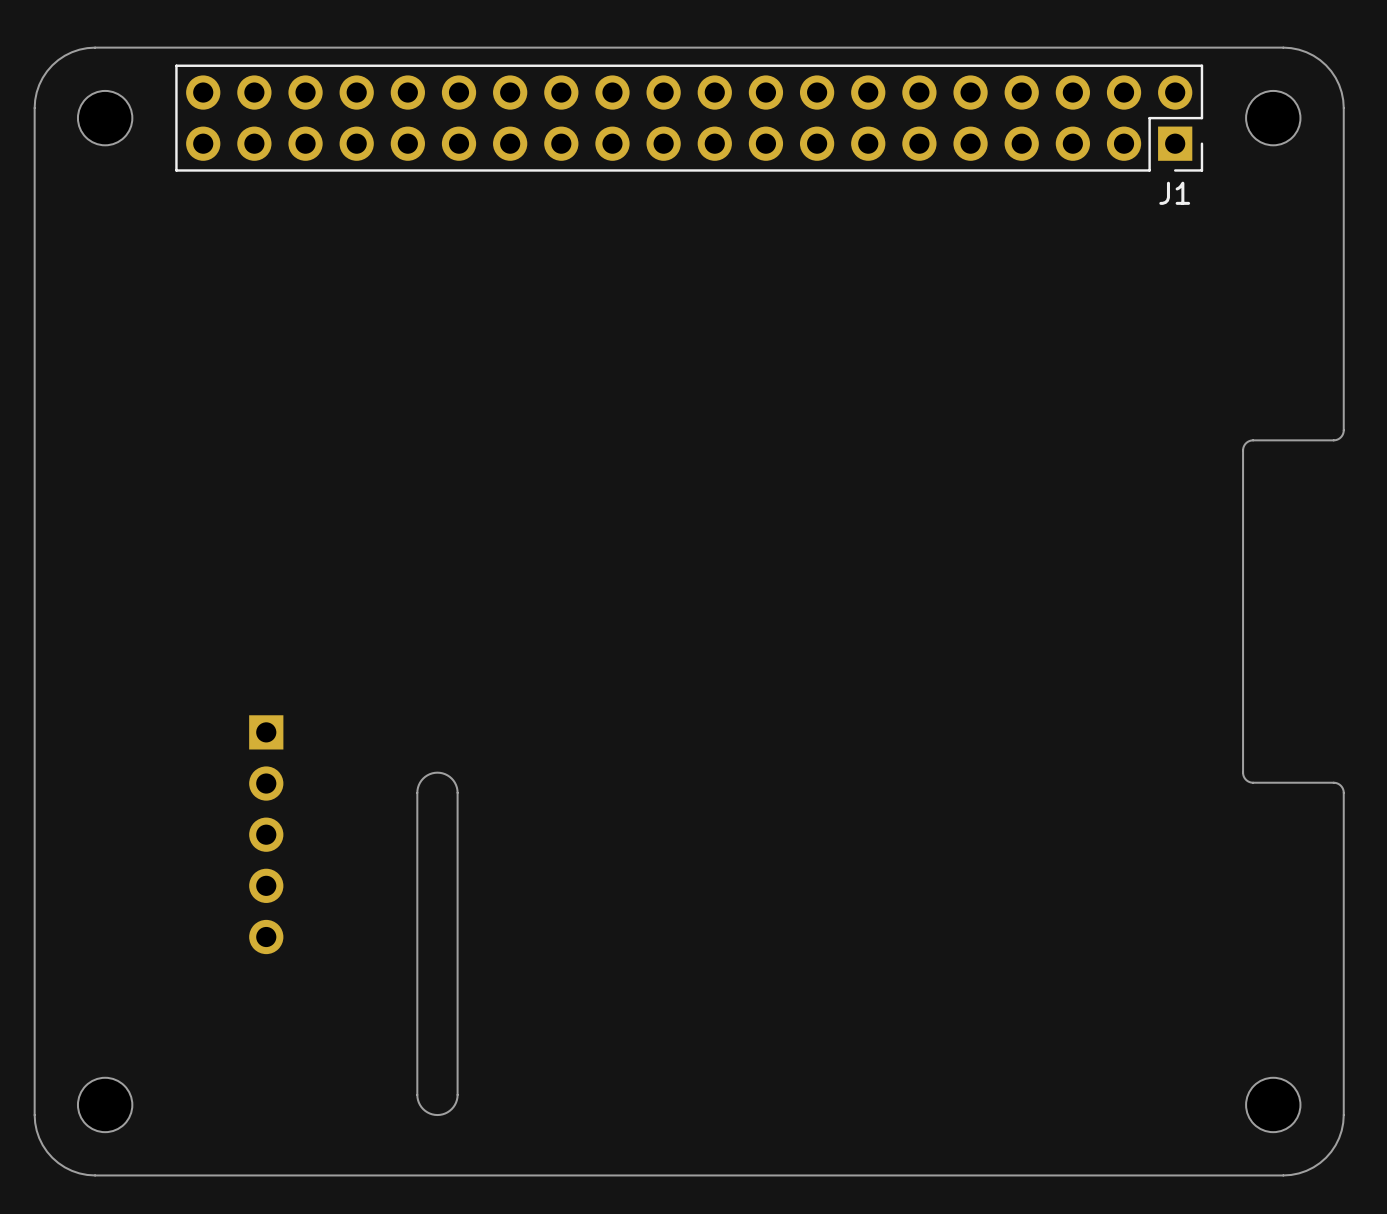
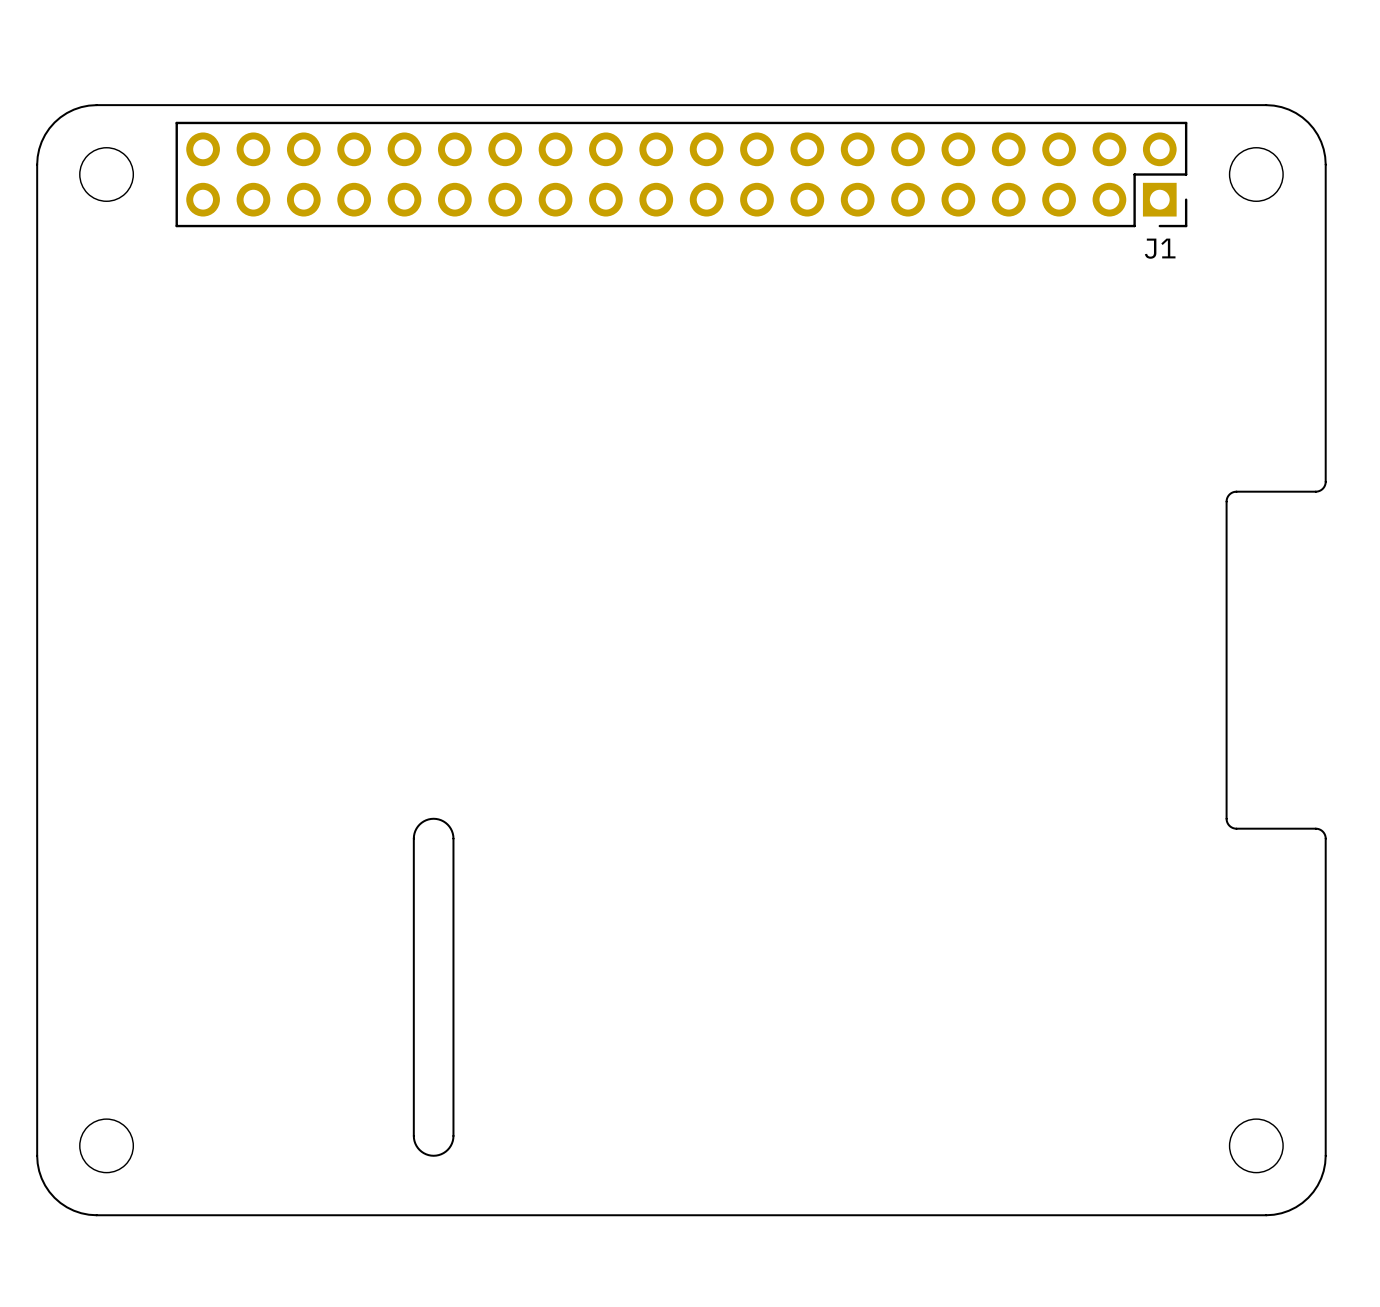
part: (266, 834) -> none

